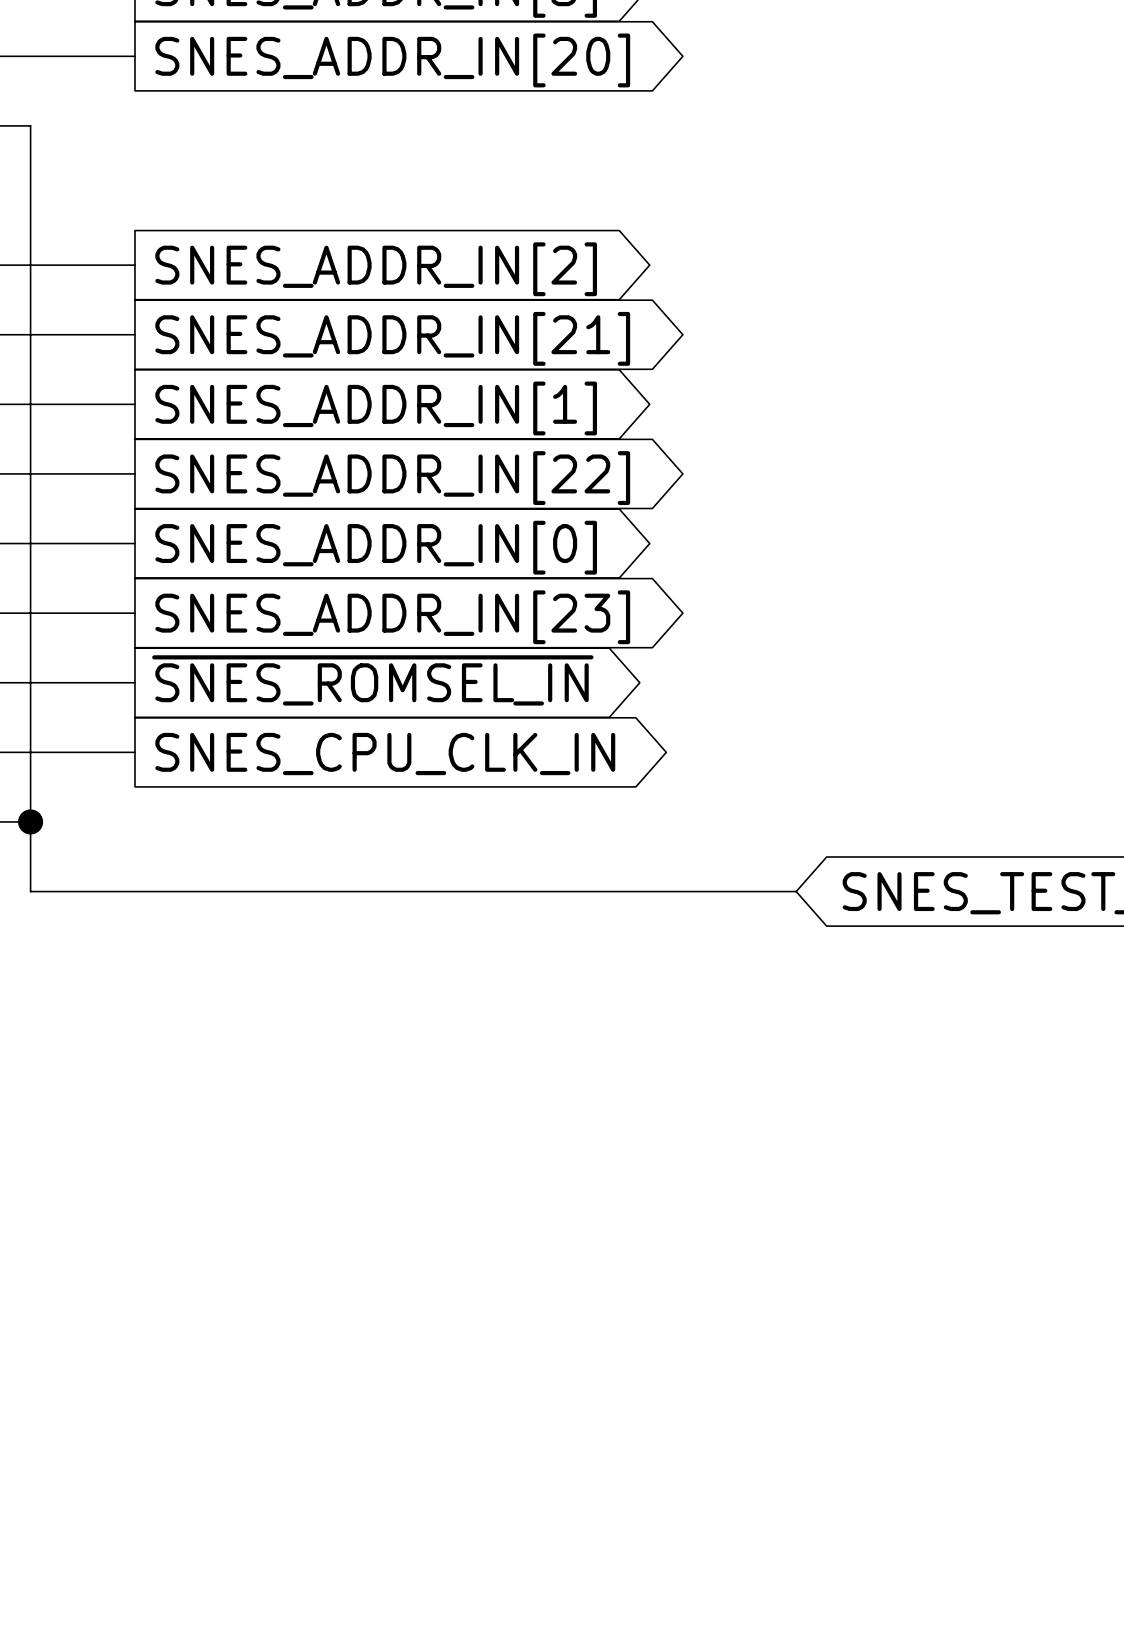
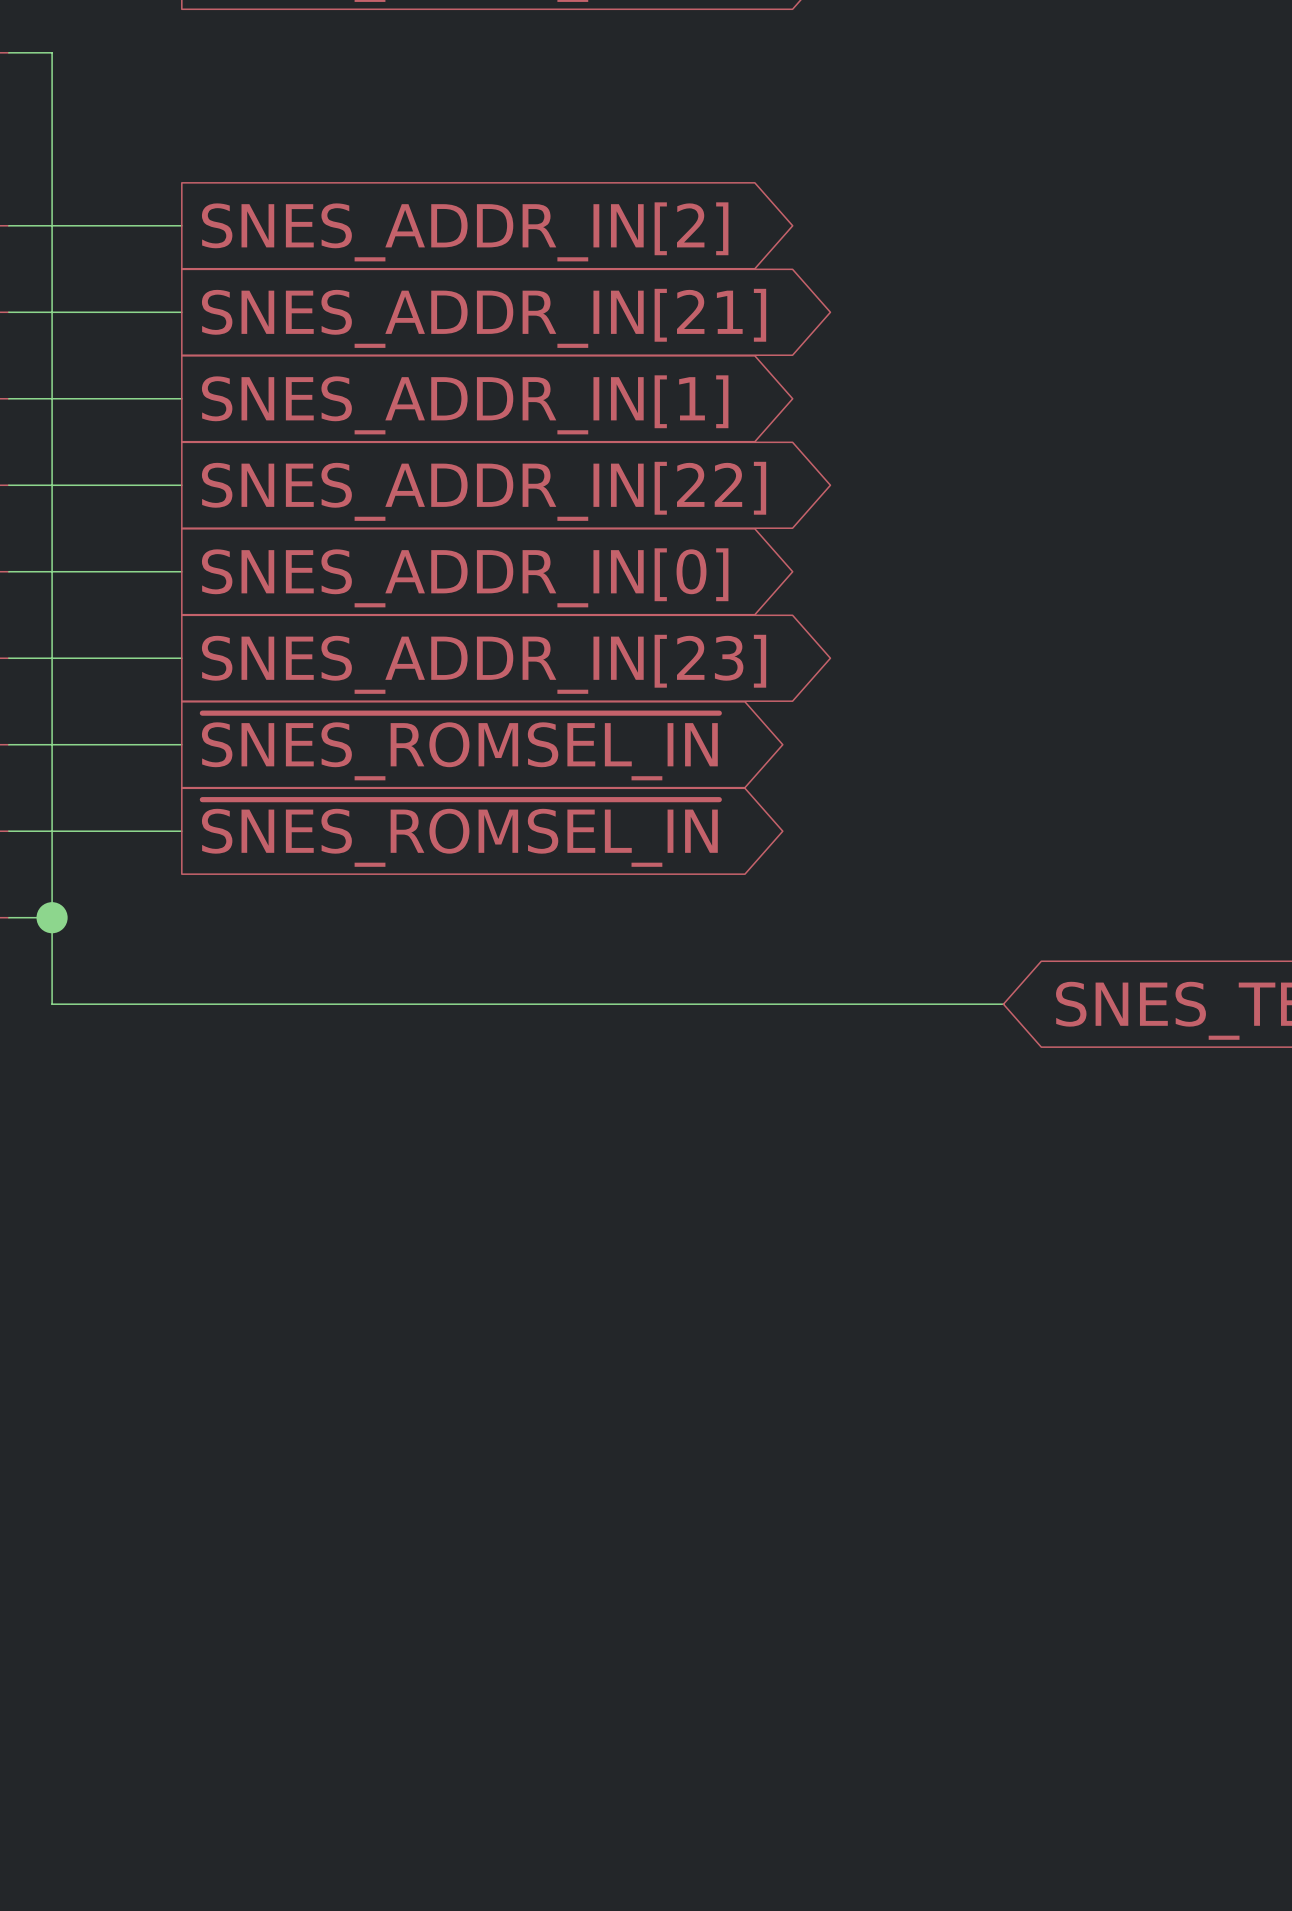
global label: SNES_CPU_CLK_IN (385, 754) -> ~{SNES_ROMSEL_IN} (460, 833)

